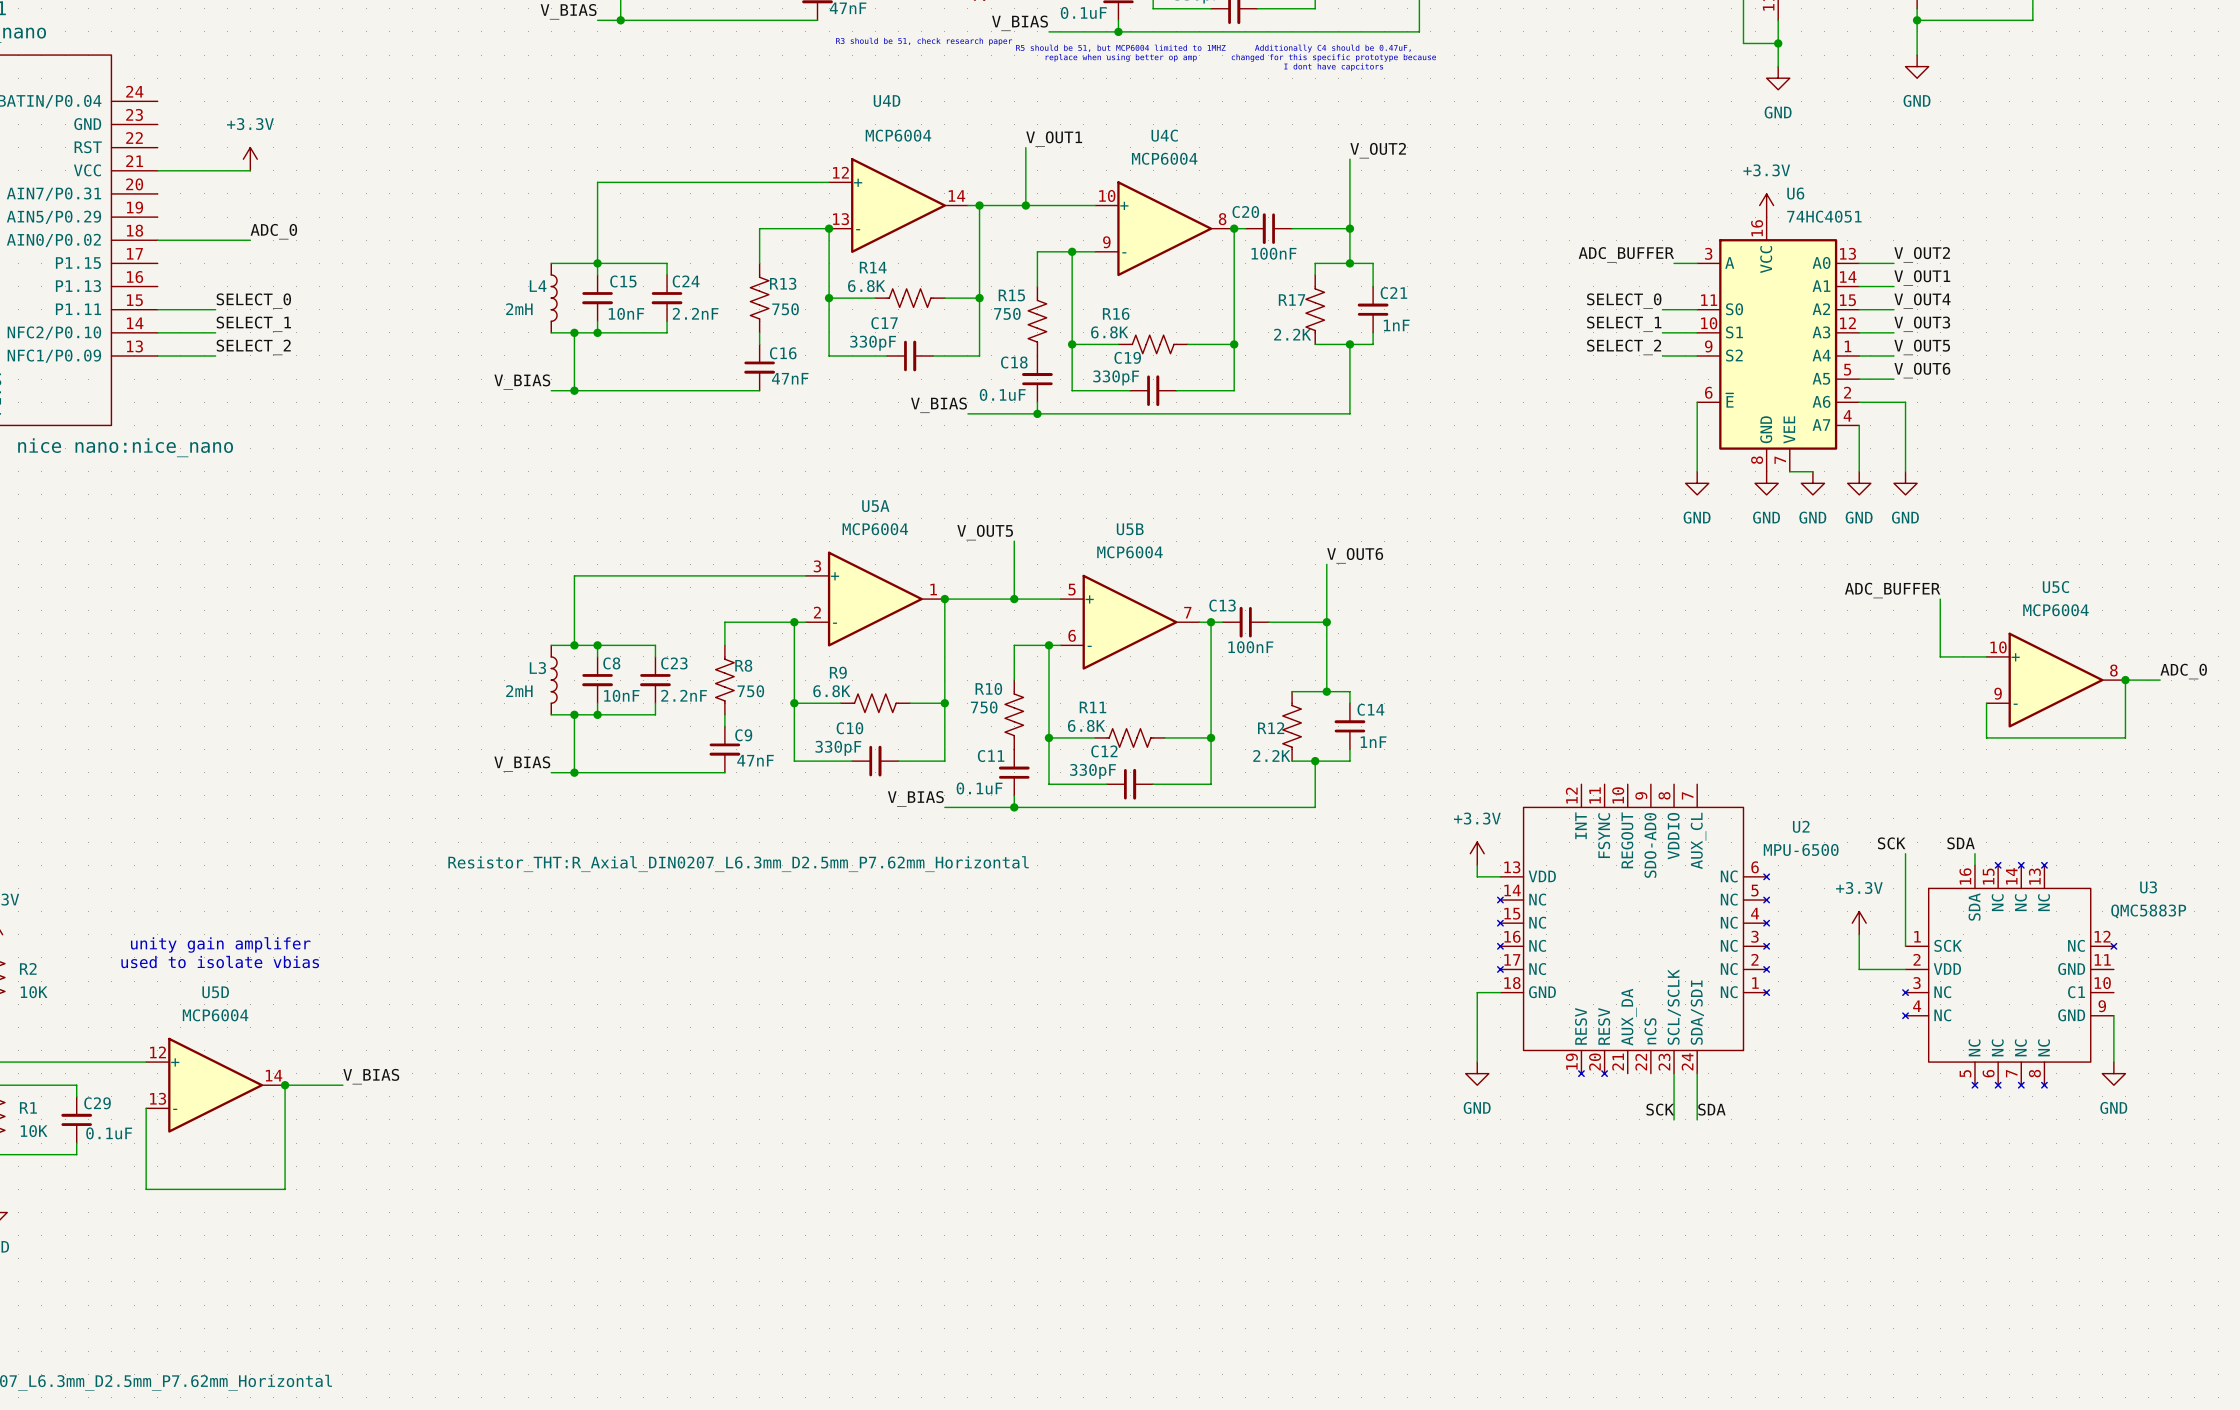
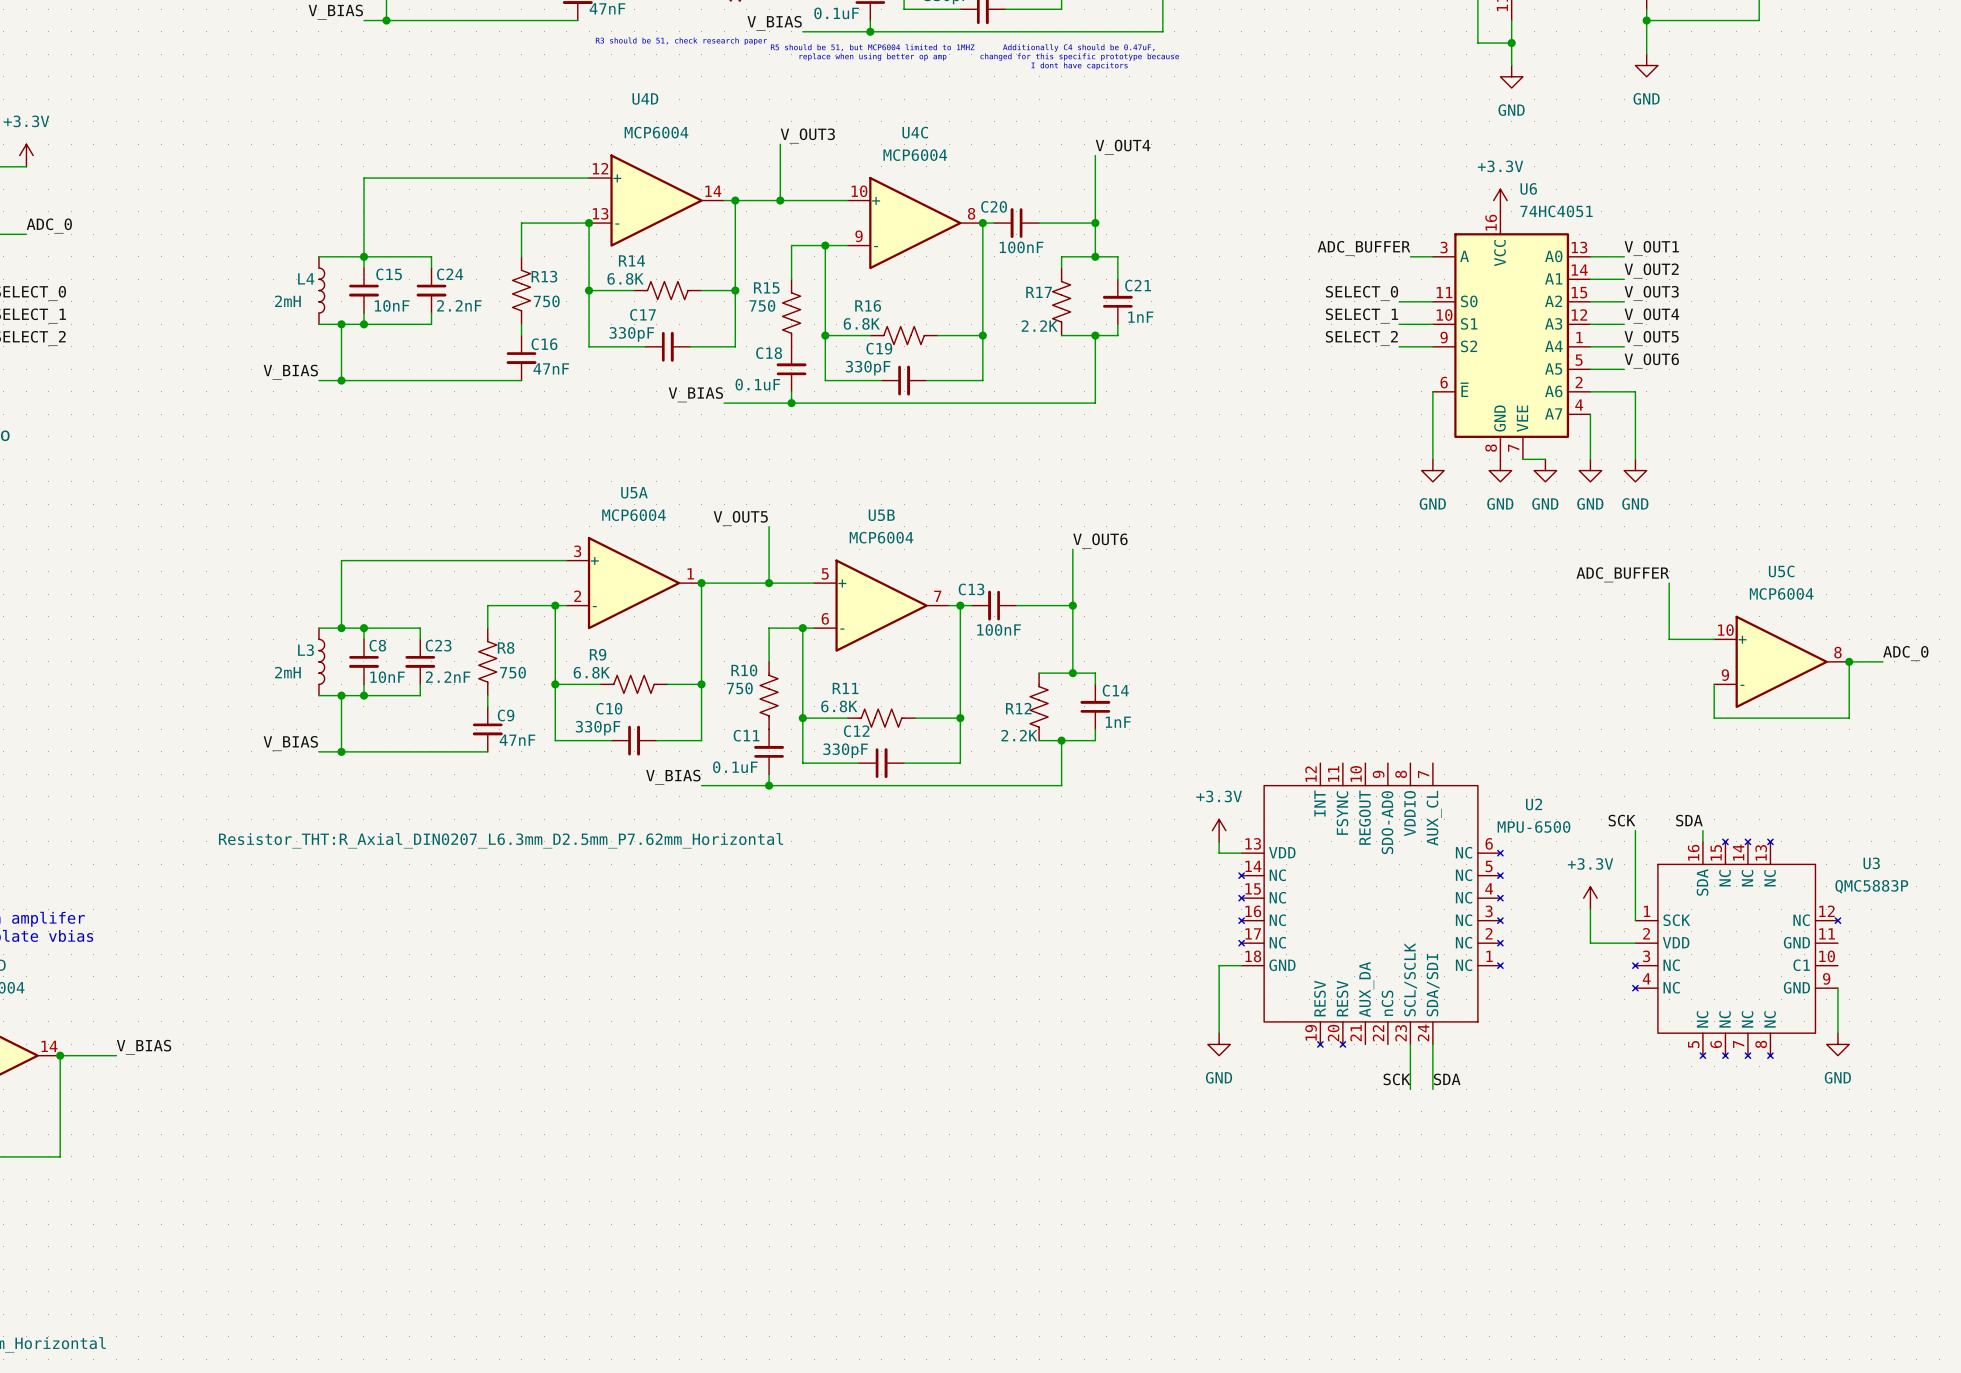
label: V_OUT1 (1054, 139) -> V_OUT3 (807, 135)
label: V_OUT2 (1378, 150) -> V_OUT4 (1123, 147)
label: V_OUT2 (1922, 254) -> V_OUT1 (1651, 248)
label: V_OUT1 (1922, 277) -> V_OUT2 (1651, 270)
label: V_OUT4 (1922, 301) -> V_OUT3 (1651, 293)
label: V_OUT3 (1922, 324) -> V_OUT4 (1651, 316)

